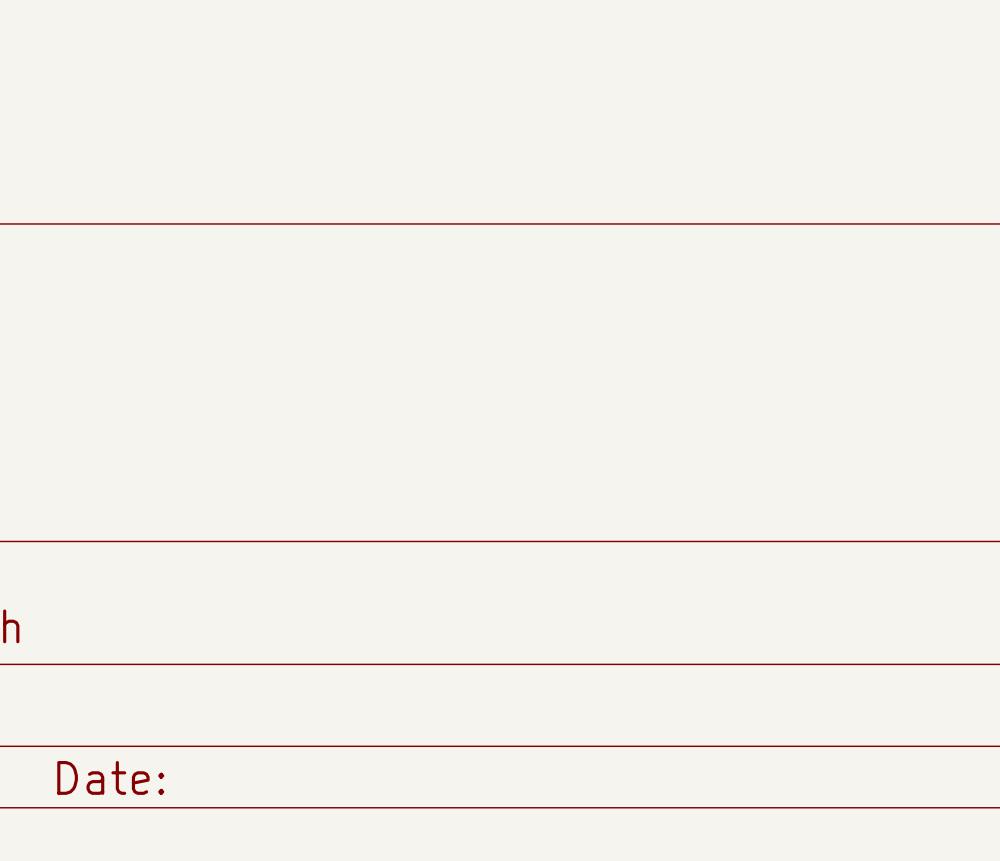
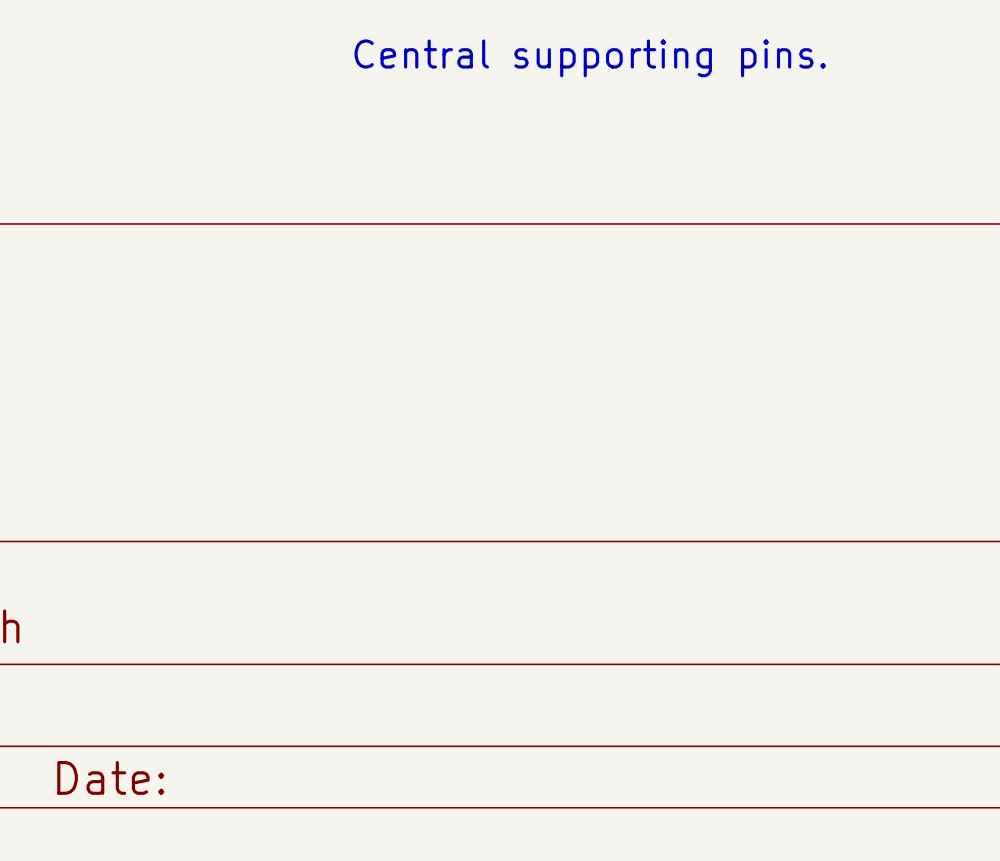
text: none -> Central supporting pins. (590, 58)

